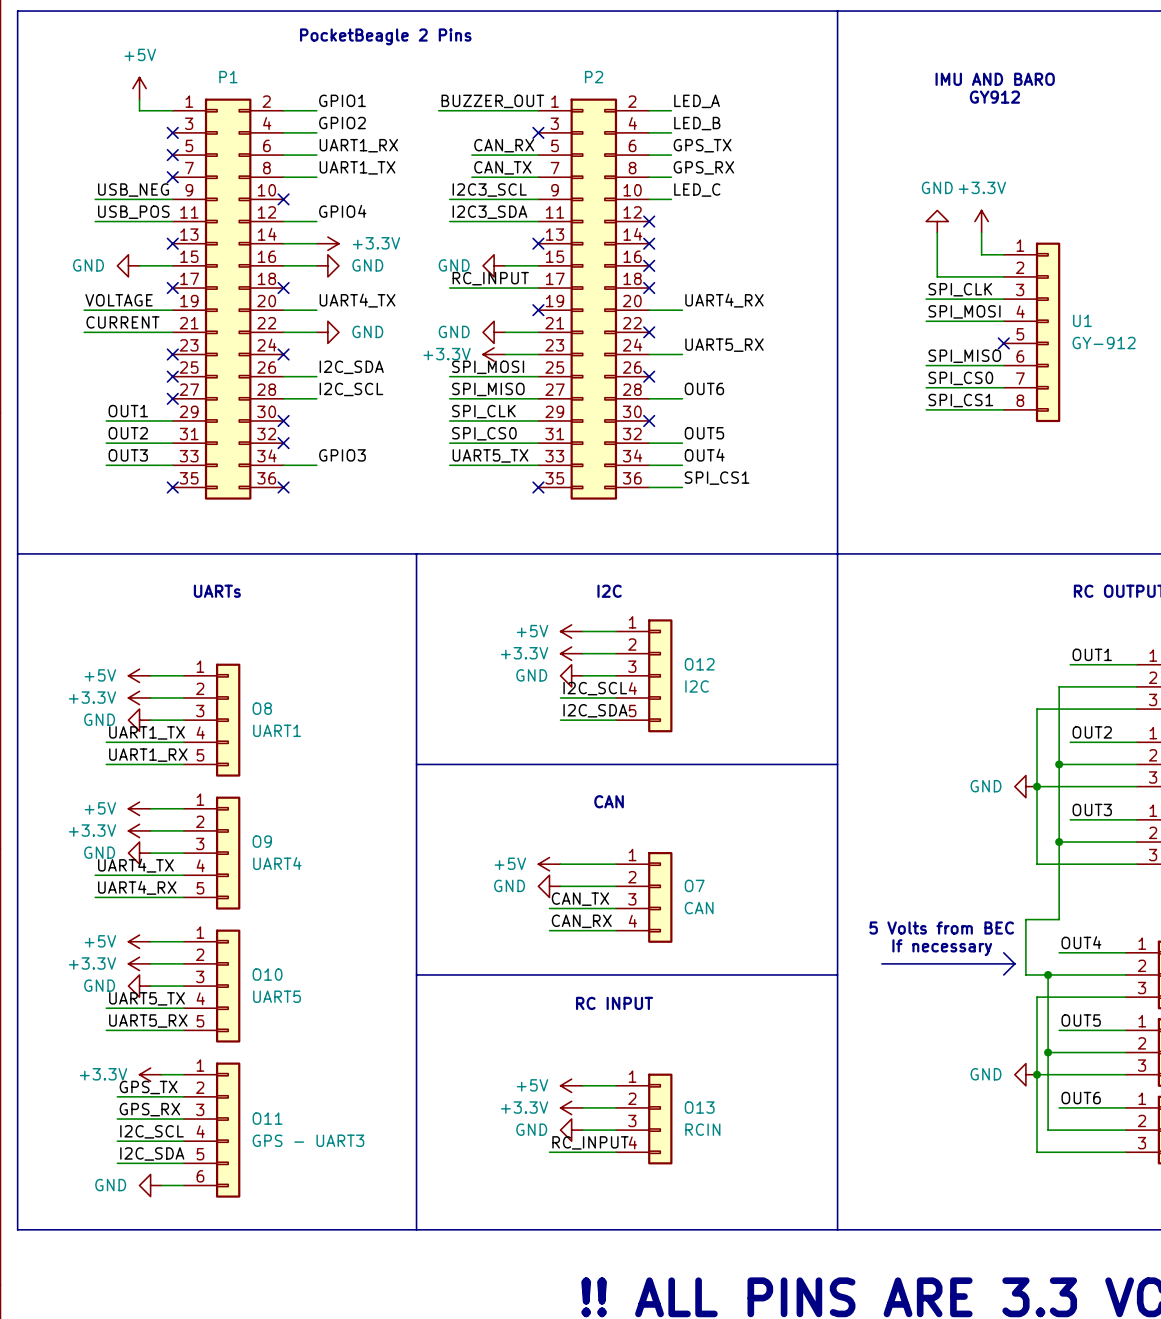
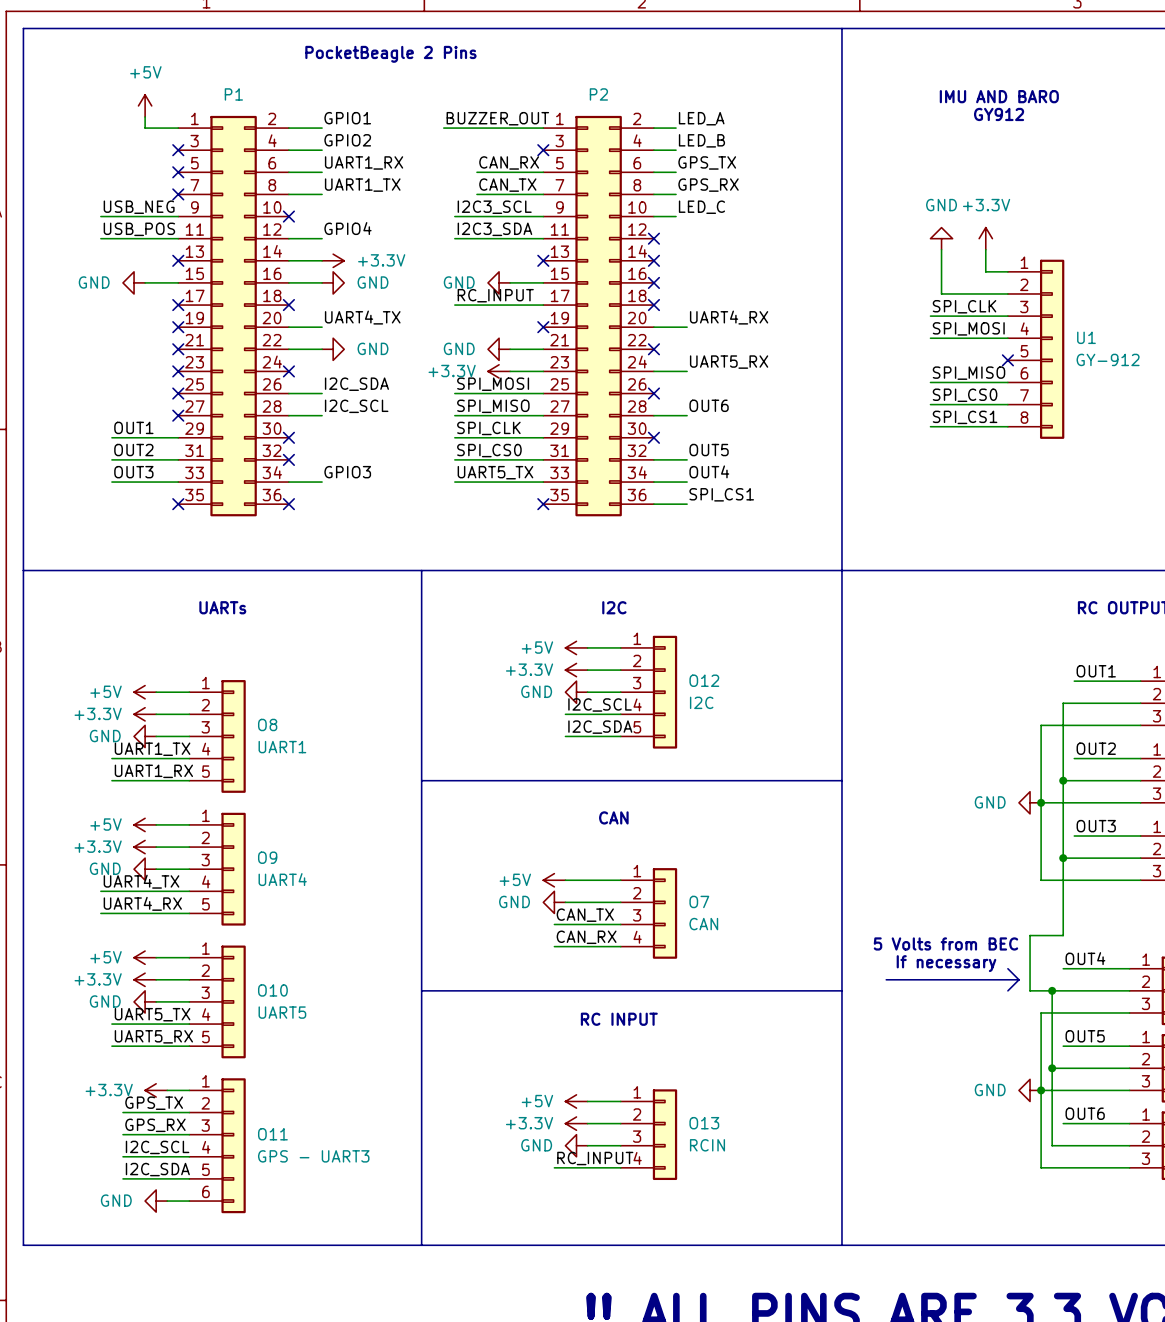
label: VOLTAGE (119, 300) -> none
wire: (84, 310) (172, 310) -> none
no-connect mark: none -> (178, 327)
label: CURRENT (122, 322) -> none
wire: (84, 332) (172, 332) -> none
no-connect mark: none -> (178, 349)

